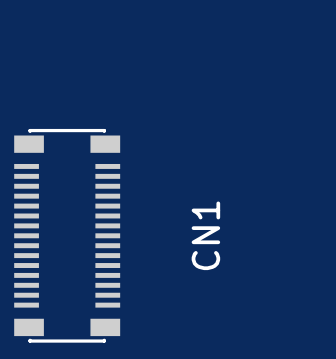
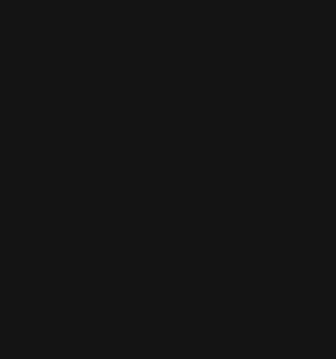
CN1: (67, 235) -> none

